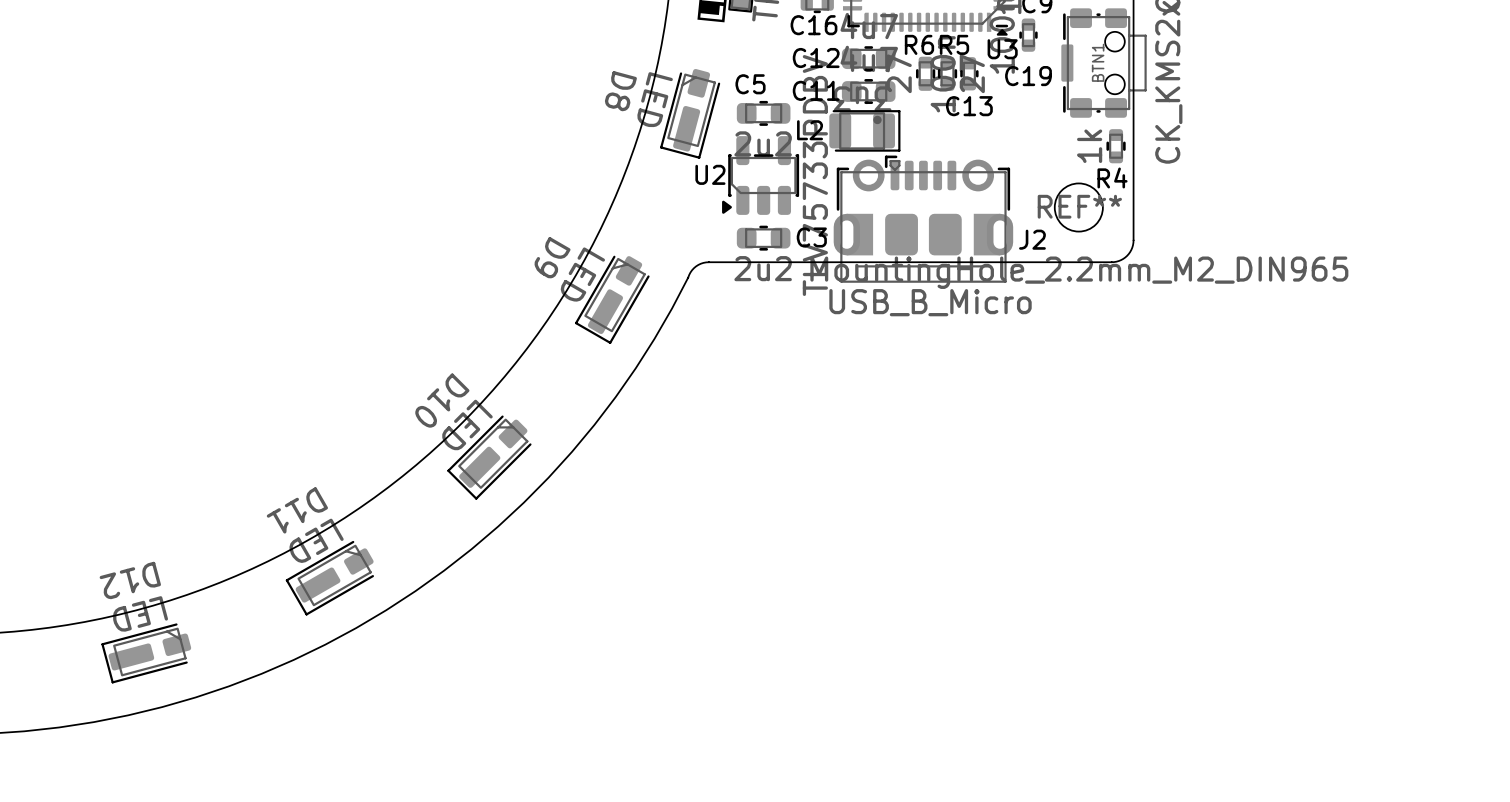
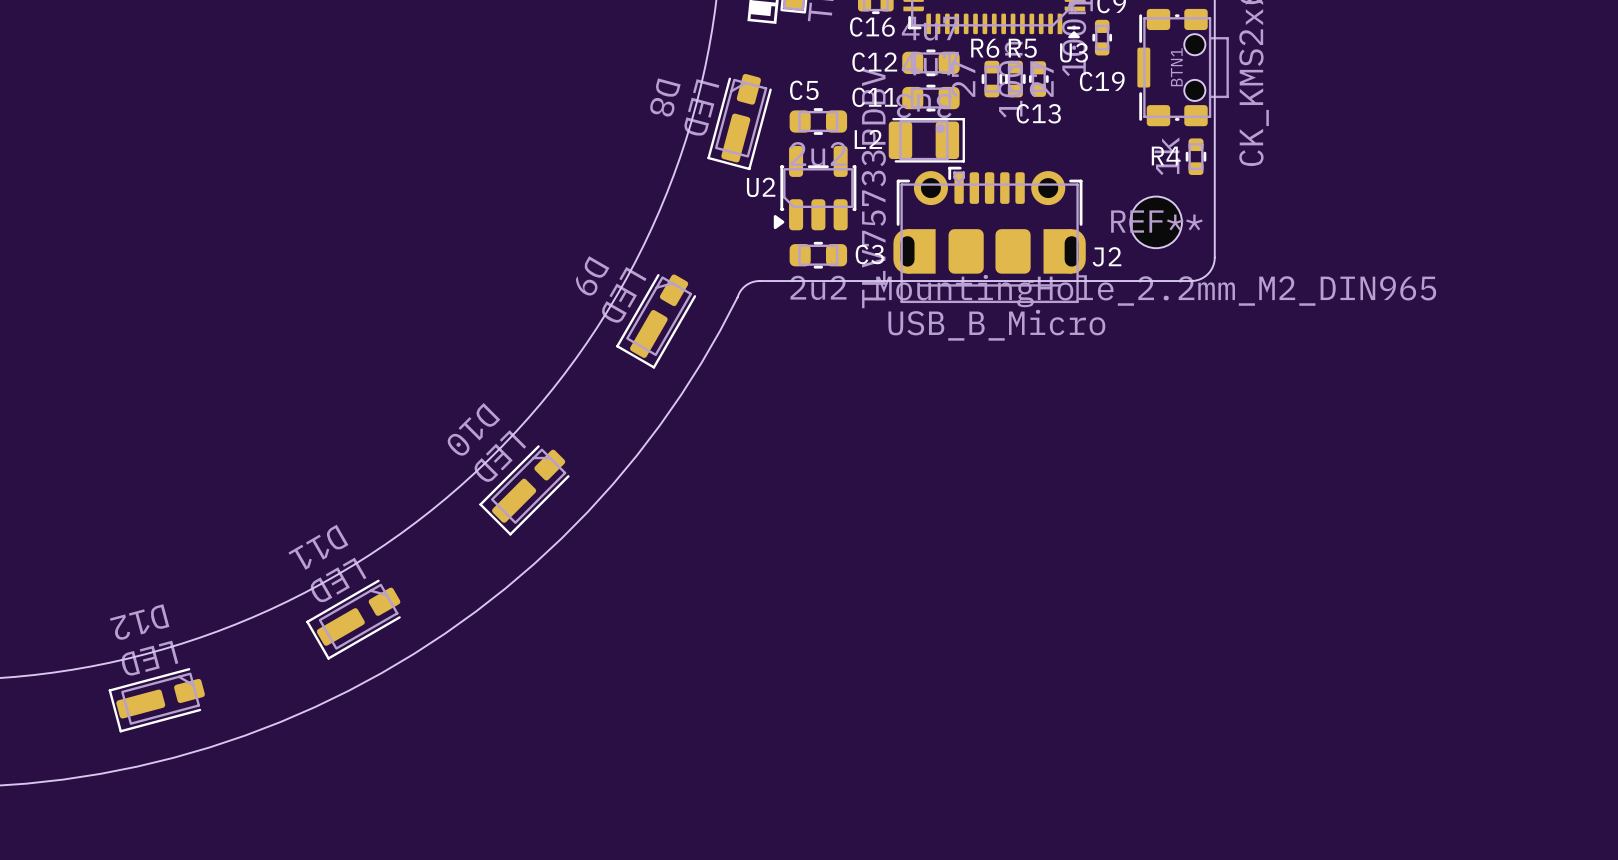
R4 name position: R4 (1112, 177) -> R4 (1166, 156)

